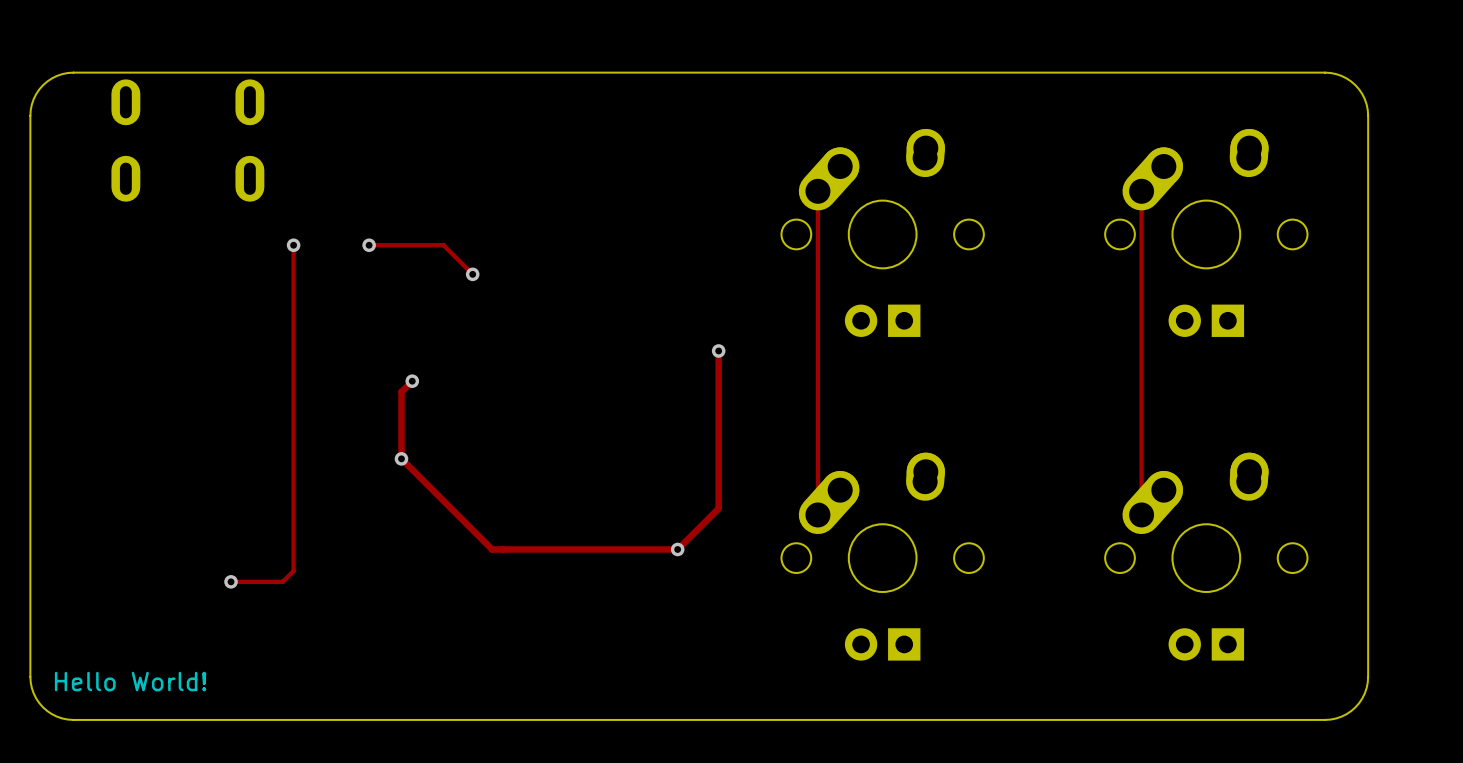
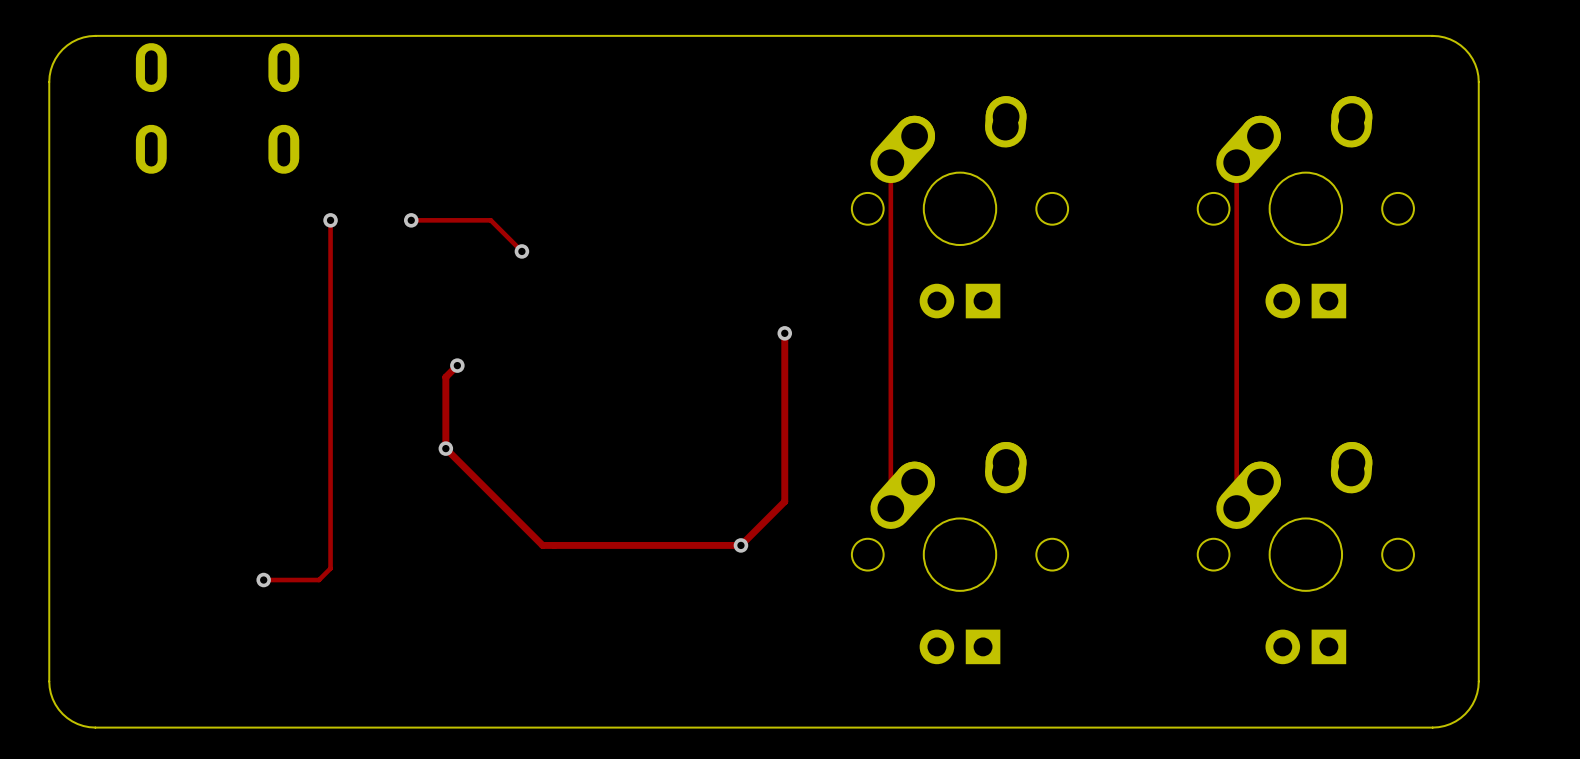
text: Hello World! (130, 681) -> none

